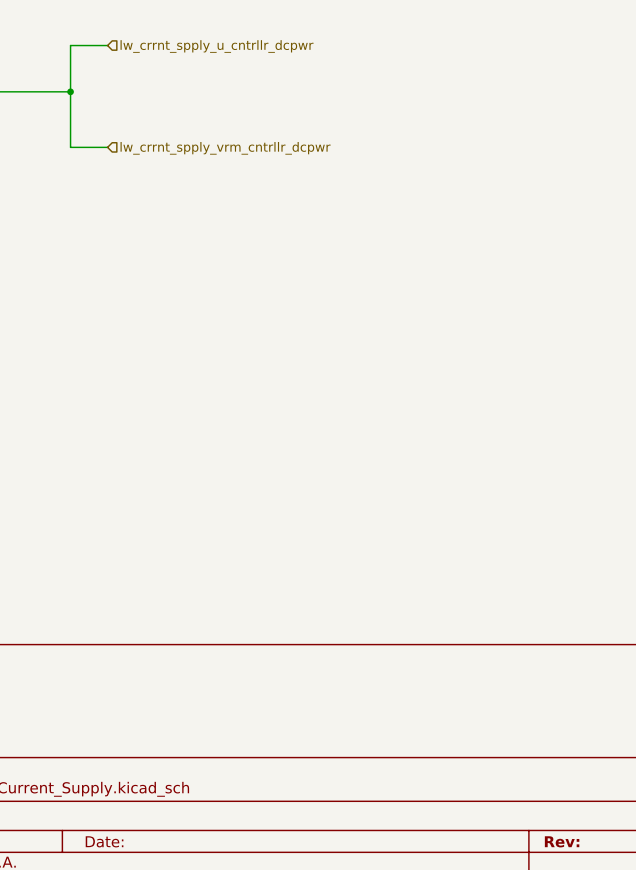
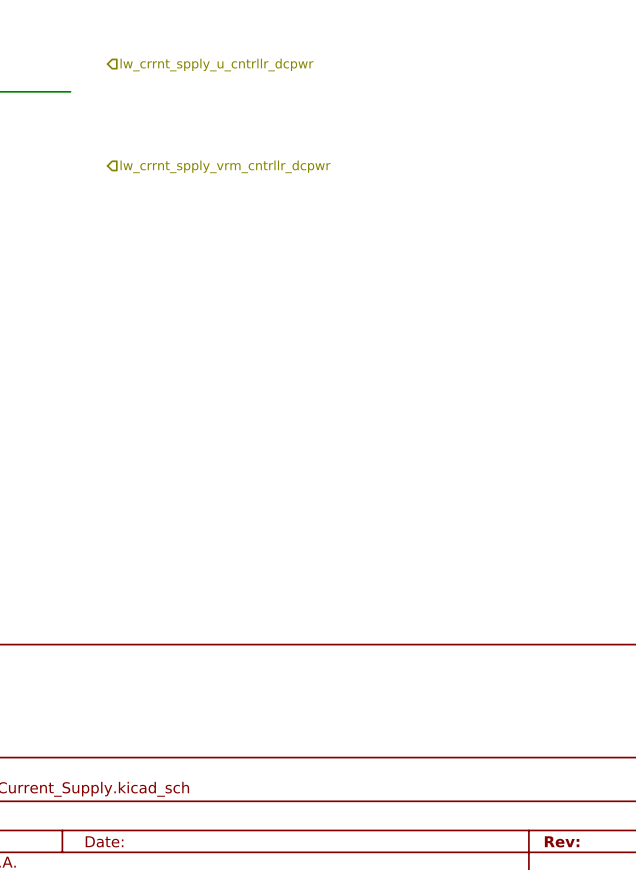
wire: (107, 45) (70, 45) (70, 147) (107, 147) -> none
hierarchical label position: lw_crrnt_spply_u_cntrllr_dcpwr (217, 46) -> lw_crrnt_spply_u_cntrllr_dcpwr (217, 65)
junction: (70, 91) -> none
hierarchical label position: lw_crrnt_spply_vrm_cntrllr_dcpwr (225, 148) -> lw_crrnt_spply_vrm_cntrllr_dcpwr (225, 166)

